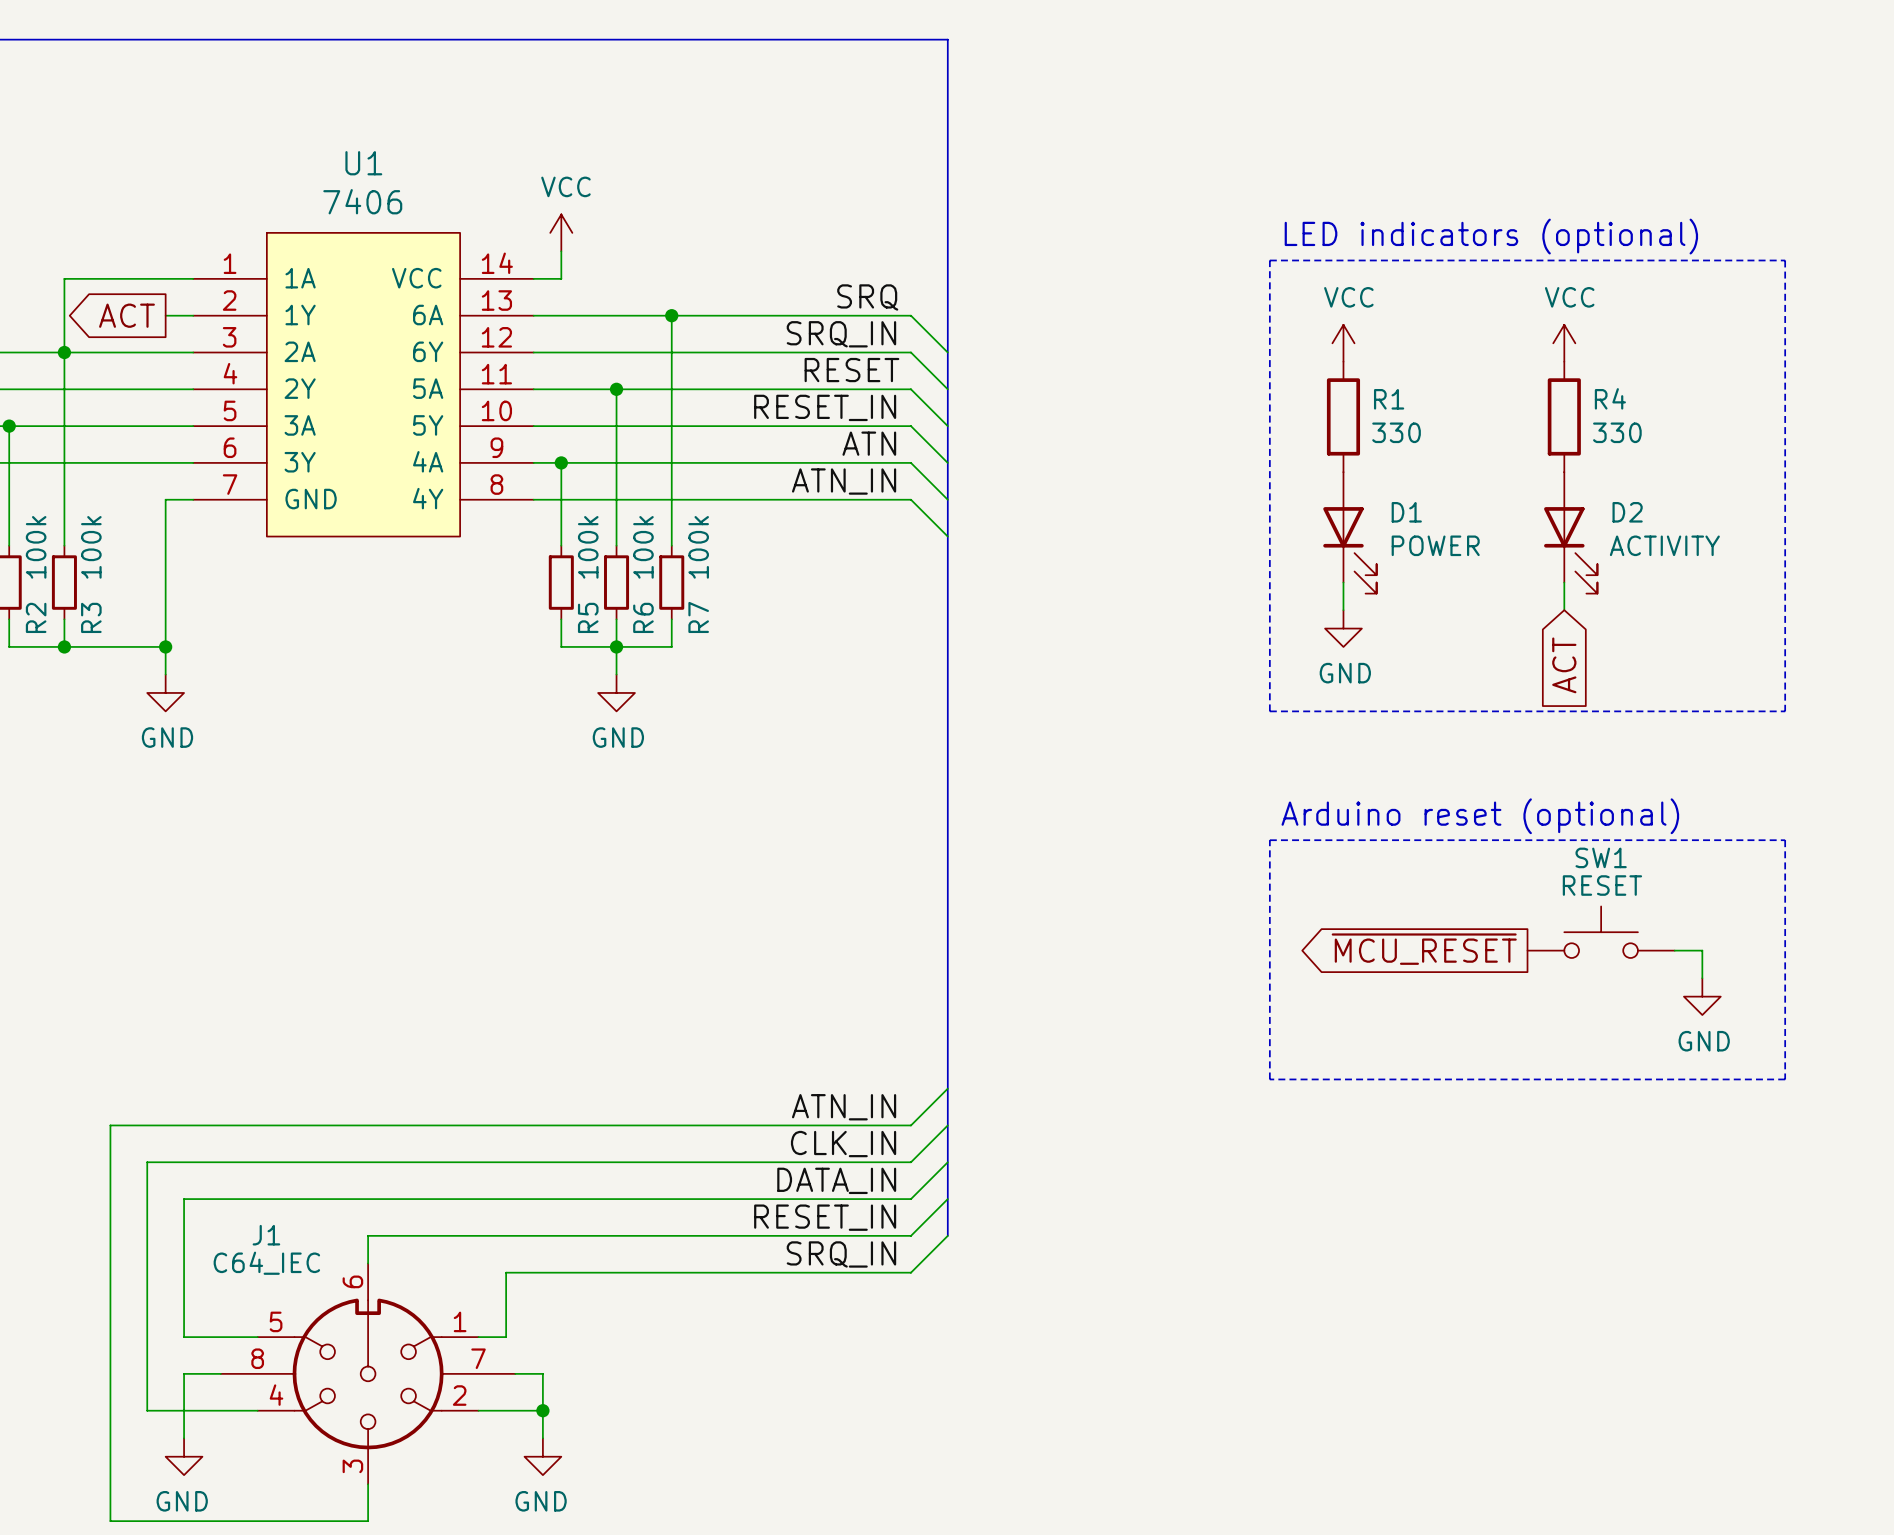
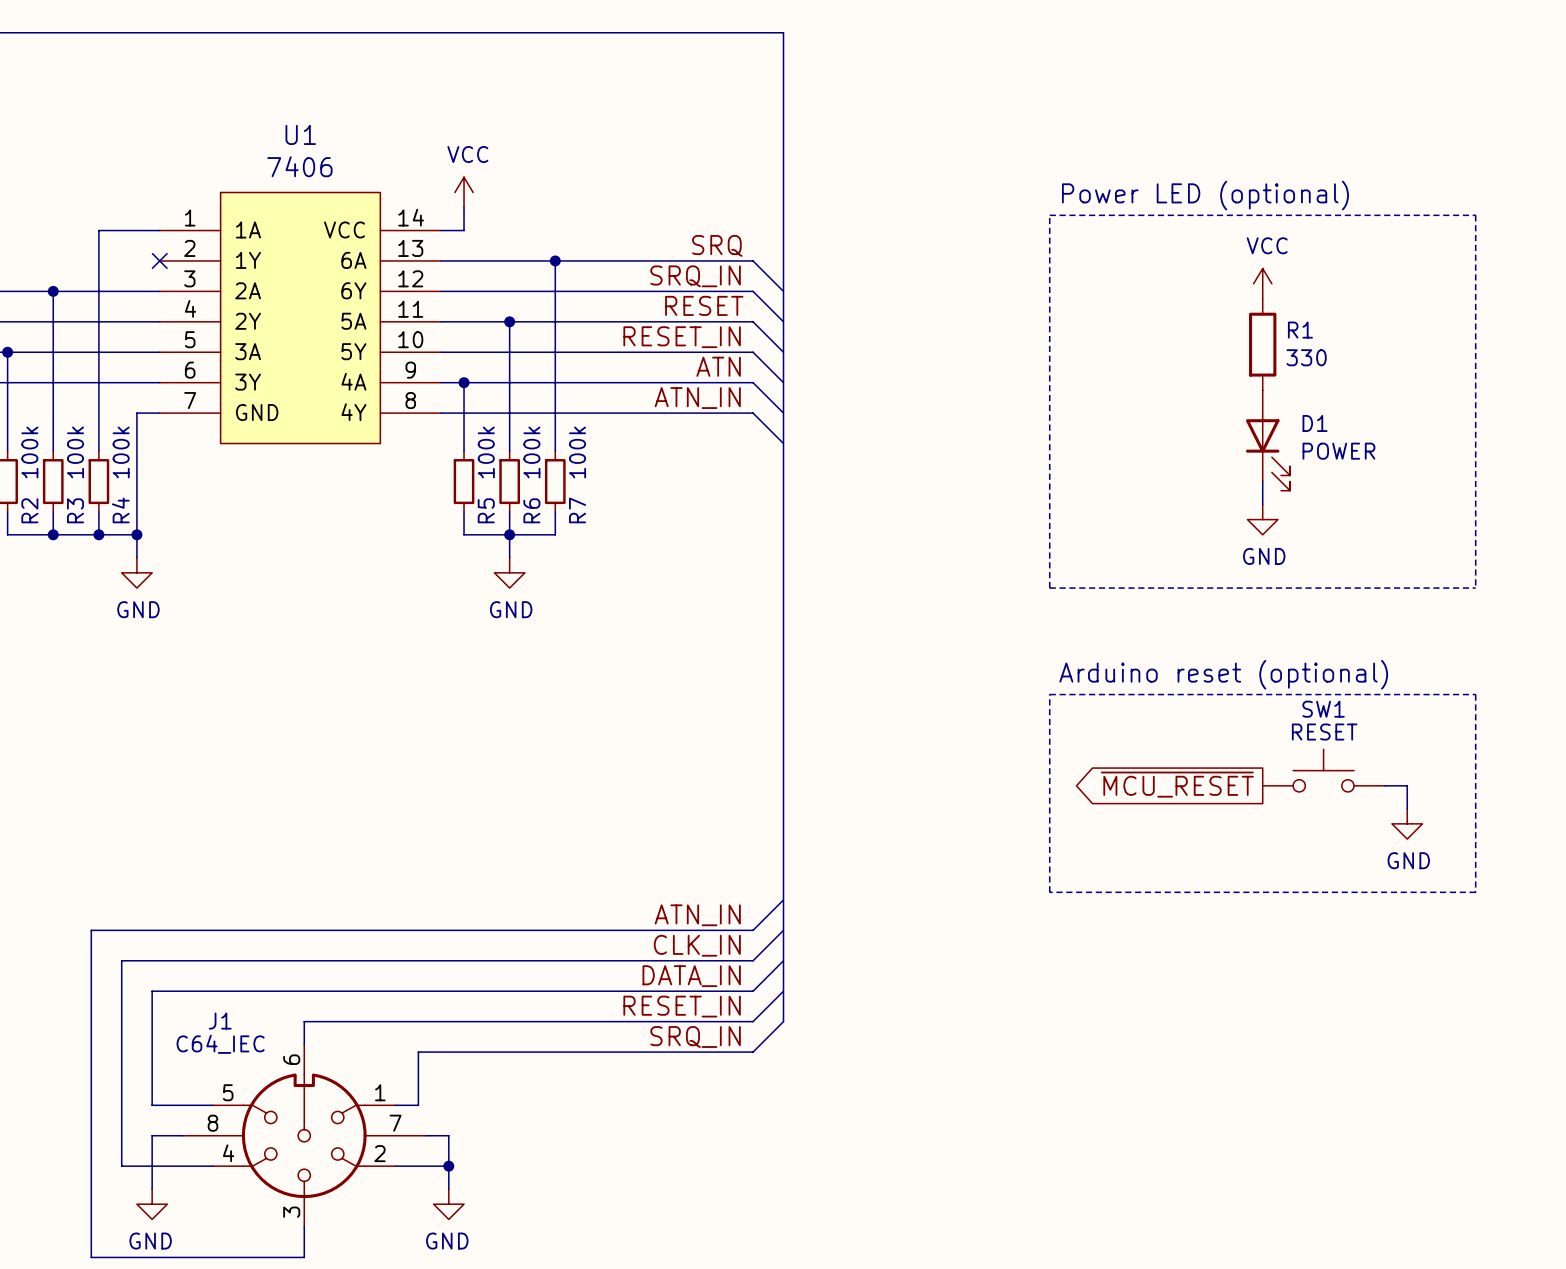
text: LED indicators (optional) (1491, 236) -> Power LED (optional) (1205, 195)
wire: (119, 278) (64, 278) (64, 352) -> (98, 230) (98, 451)
global label: ACT (126, 315) -> none
wire: (165, 315) (193, 315) -> none
no-connect mark: none -> (159, 260)
power symbol: VCC (1343, 343) -> none
power symbol position: VCC (1564, 343) -> VCC (1262, 283)
R4 symbol: [1547, 361, 1581, 473] -> [88, 451, 110, 512]
R4 name position: R4 (1610, 398) -> R4 (120, 510)
R1 position: (1343, 416) -> (1262, 344)
R4 value: 330 (1617, 432) -> 100k (121, 452)
D1 position: (1349, 532) -> (1268, 440)
D2: ACTIVITY (1570, 532) -> none
wire: (1343, 582) (1343, 610) -> none
wire: (1564, 582) (1564, 610) -> (1262, 481) (1262, 504)
wire: none -> (98, 511) (98, 534)
power symbol position: GND (1343, 628) -> GND (1262, 519)
junction: none -> (98, 534)
global label: ACT (1564, 665) -> none

